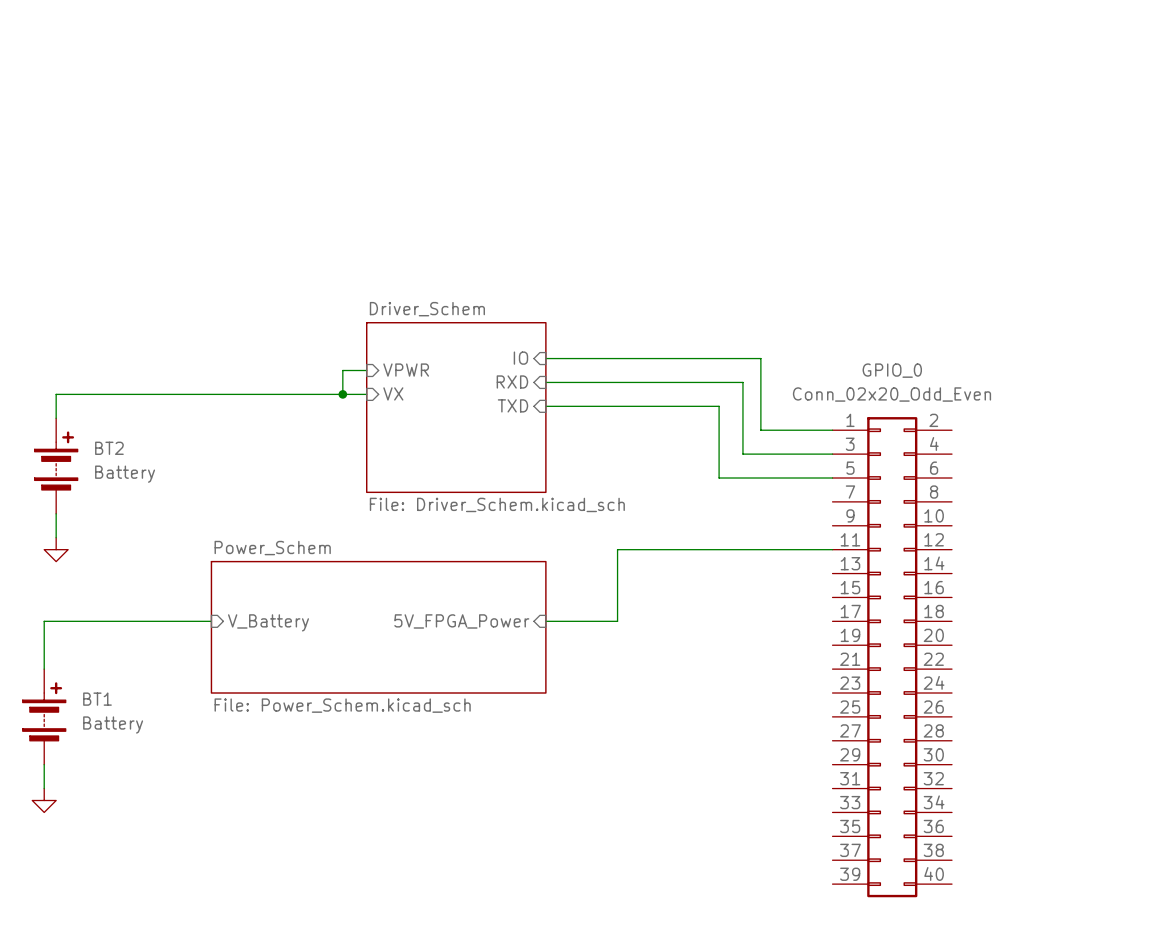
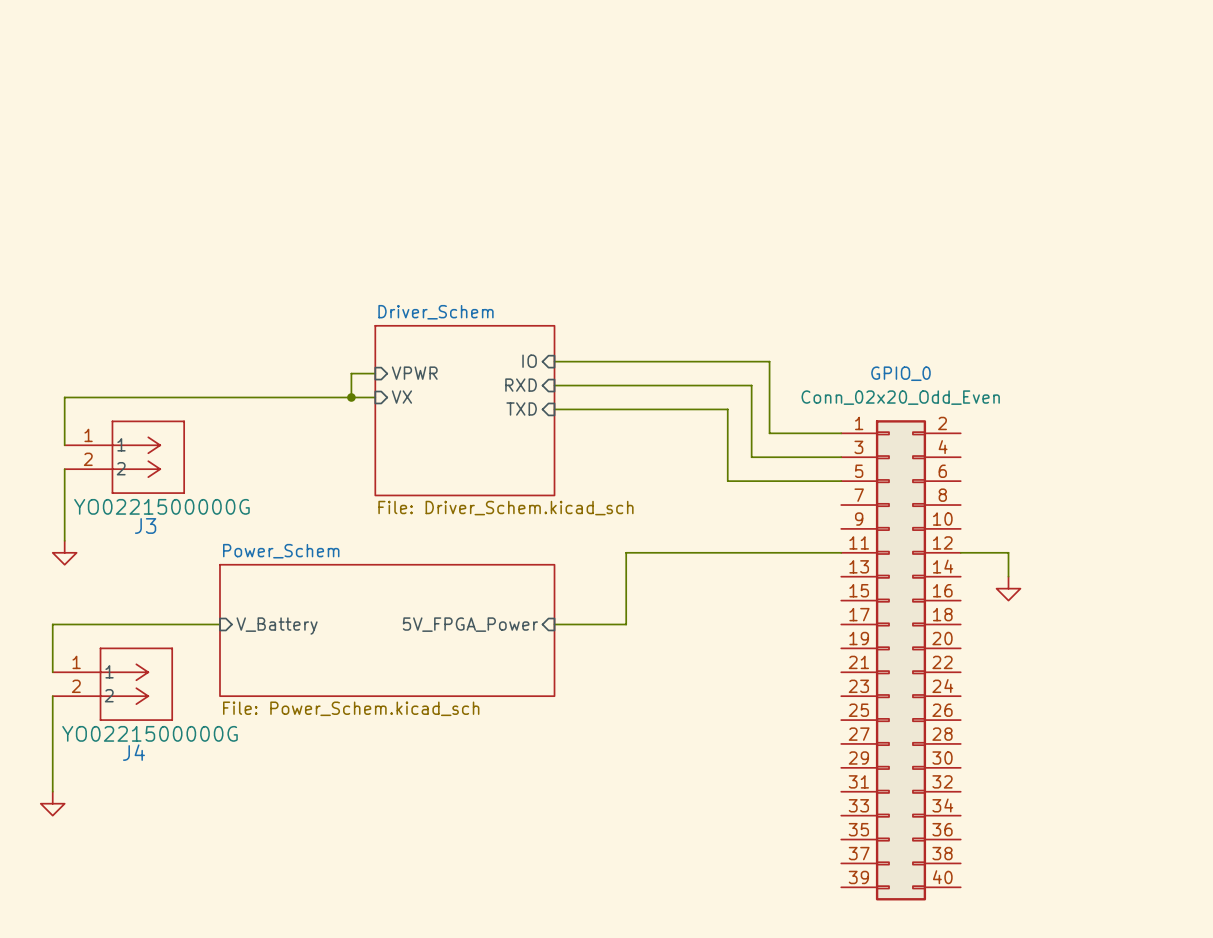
J3: none -> YO0221500000G (124, 457)
BT2: Battery (56, 466) -> none
wire: none -> (960, 552) (1008, 552) (1008, 576)
power symbol: none -> (1008, 588)
J4: none -> YO0221500000G (112, 684)
BT1: Battery (44, 716) -> none

